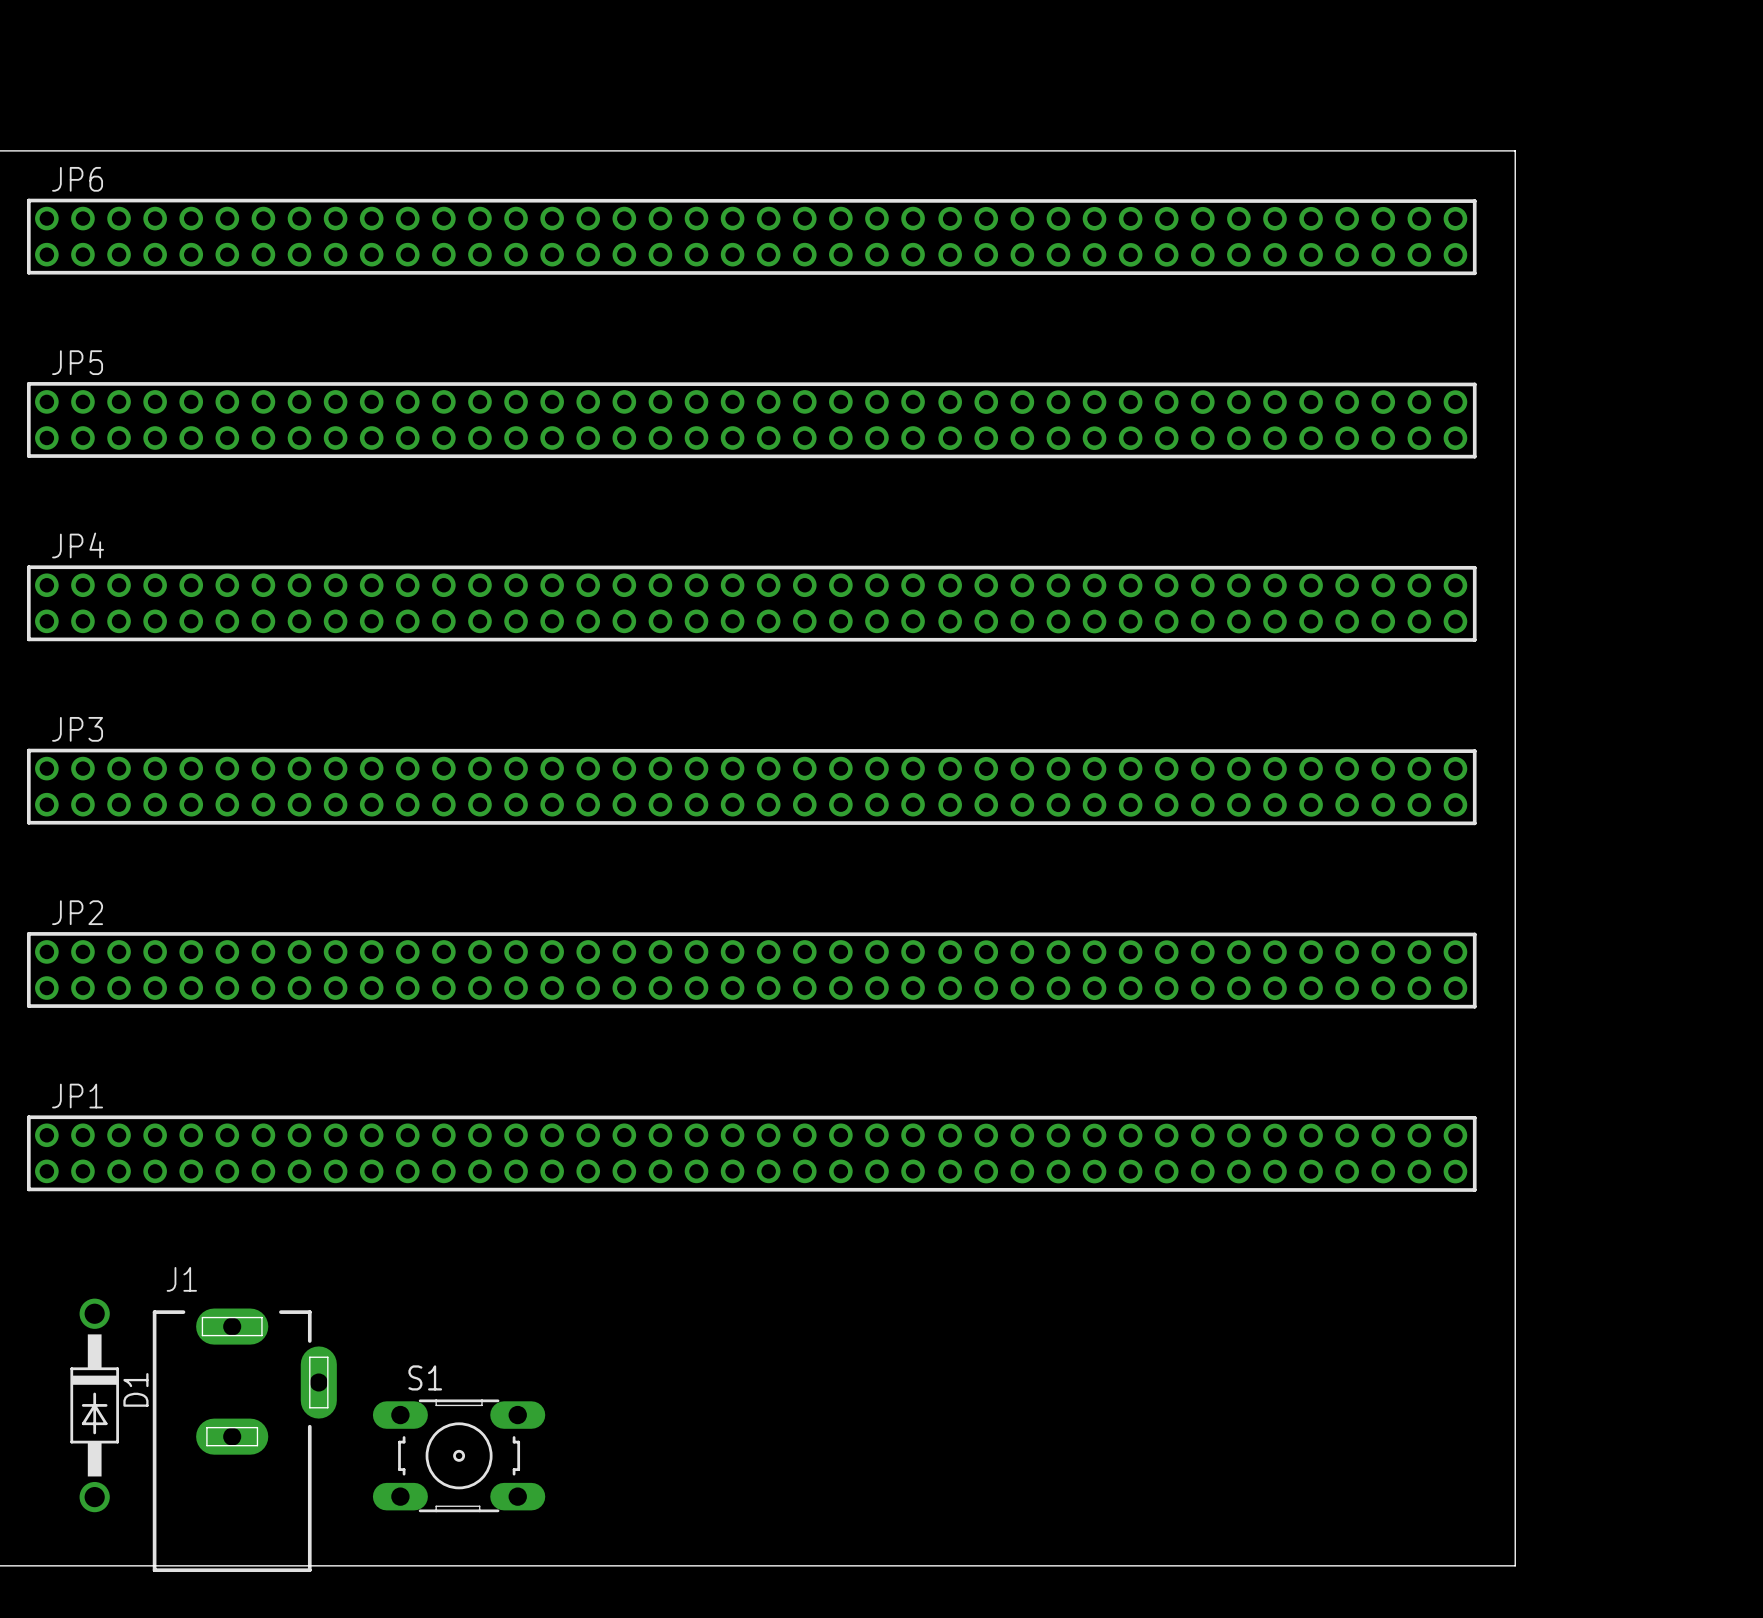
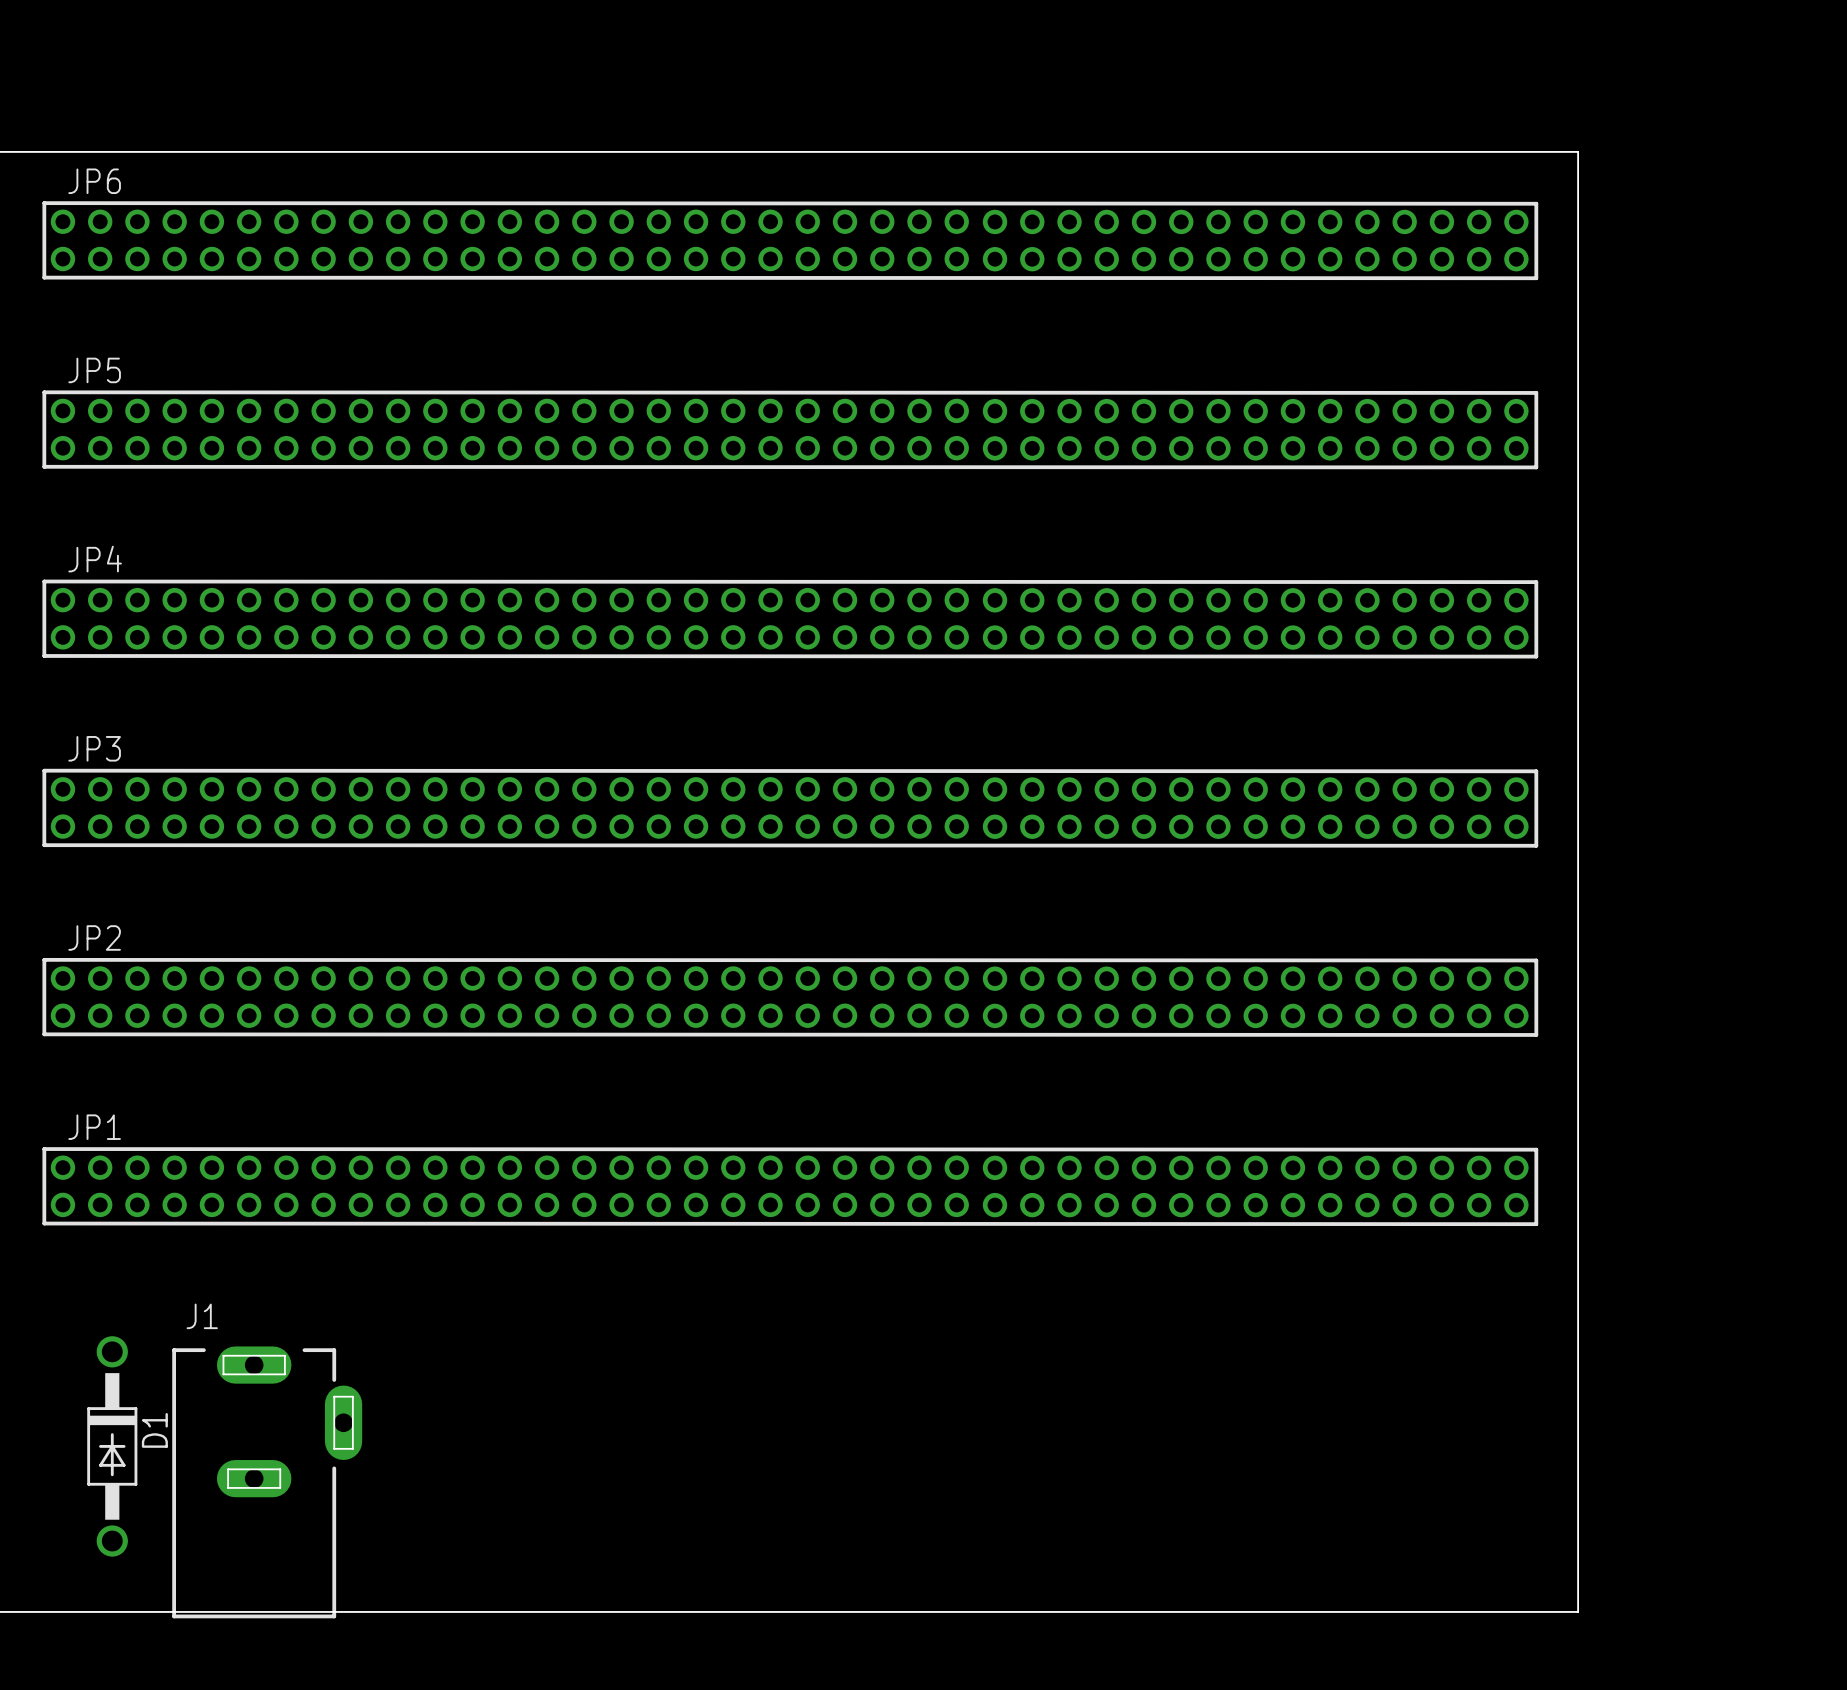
S1: (459, 1455) -> none

